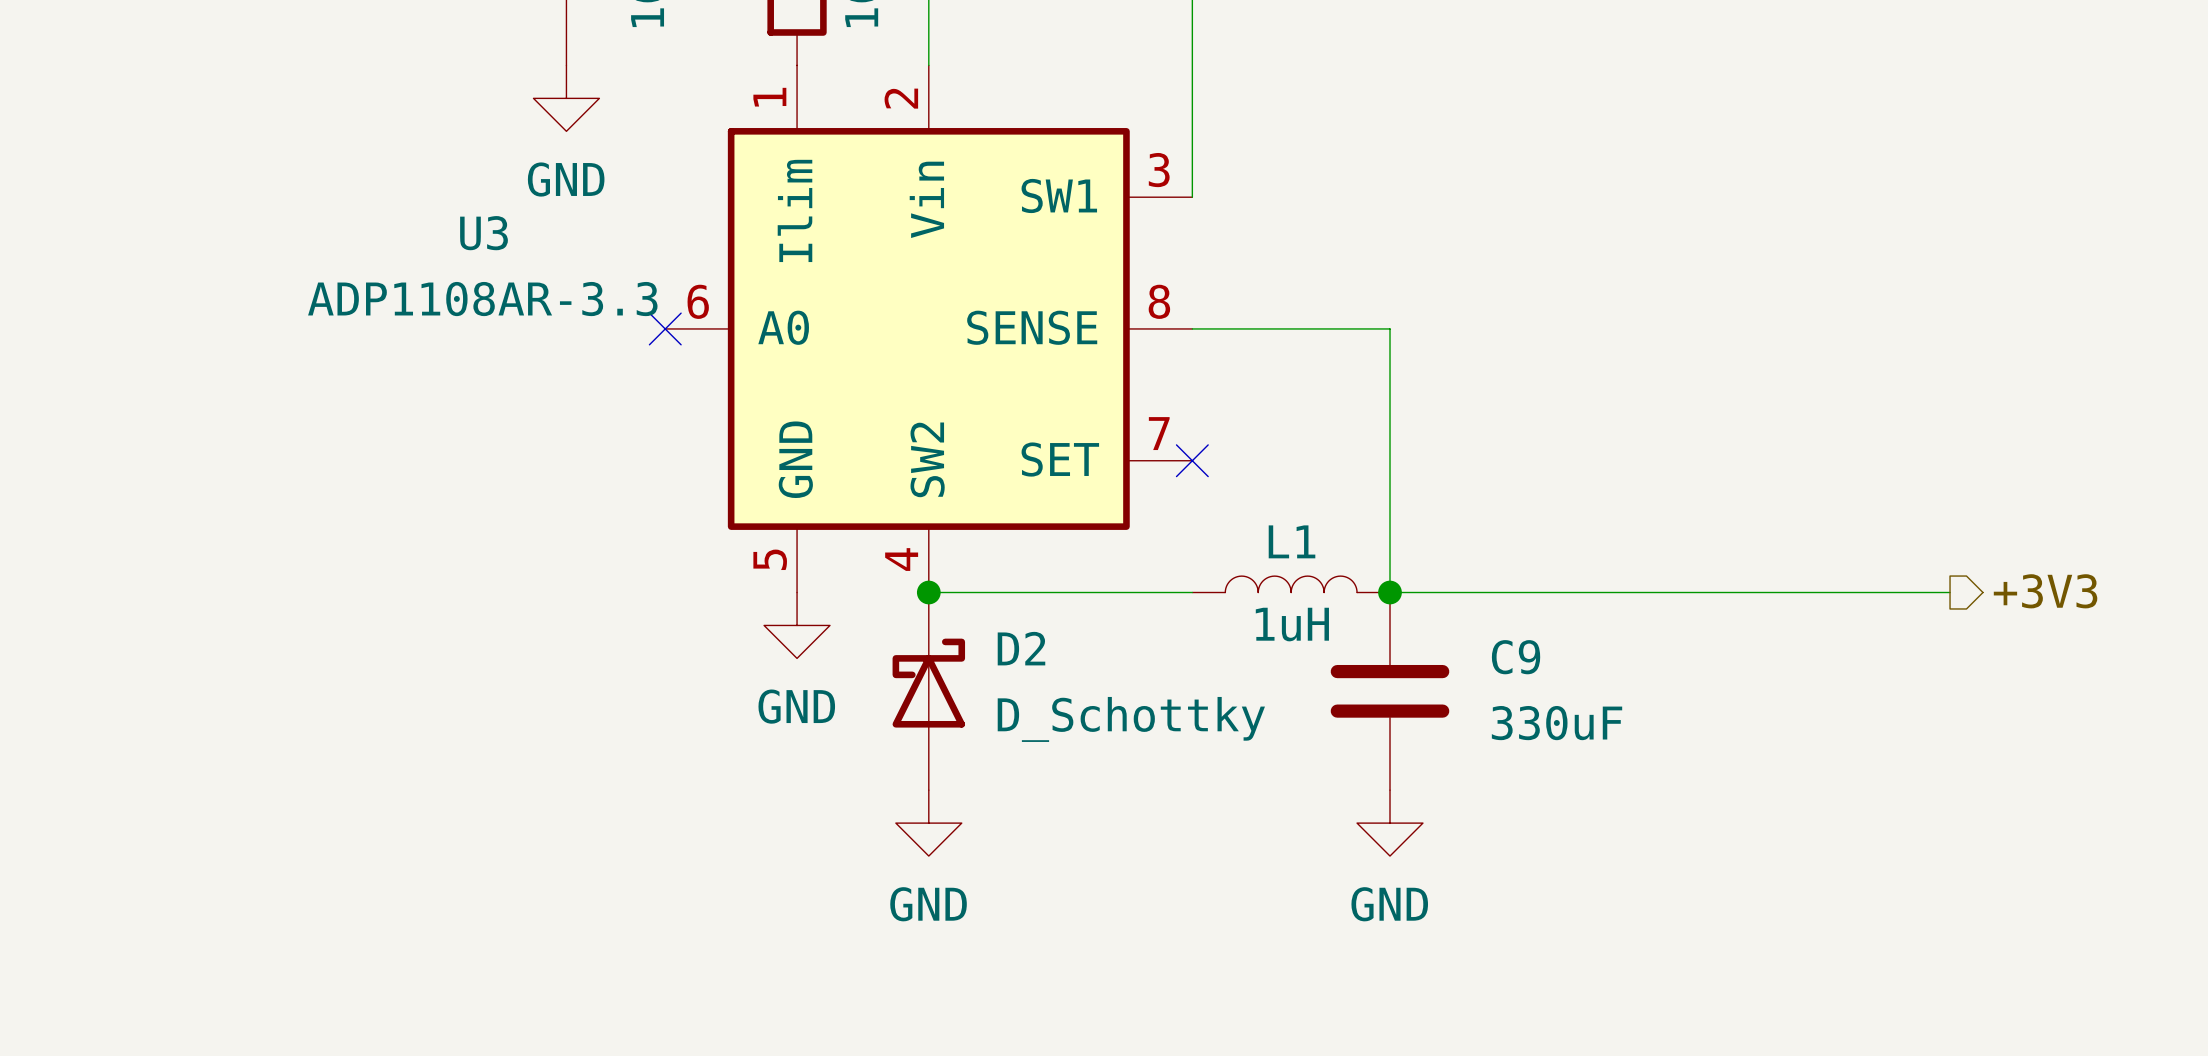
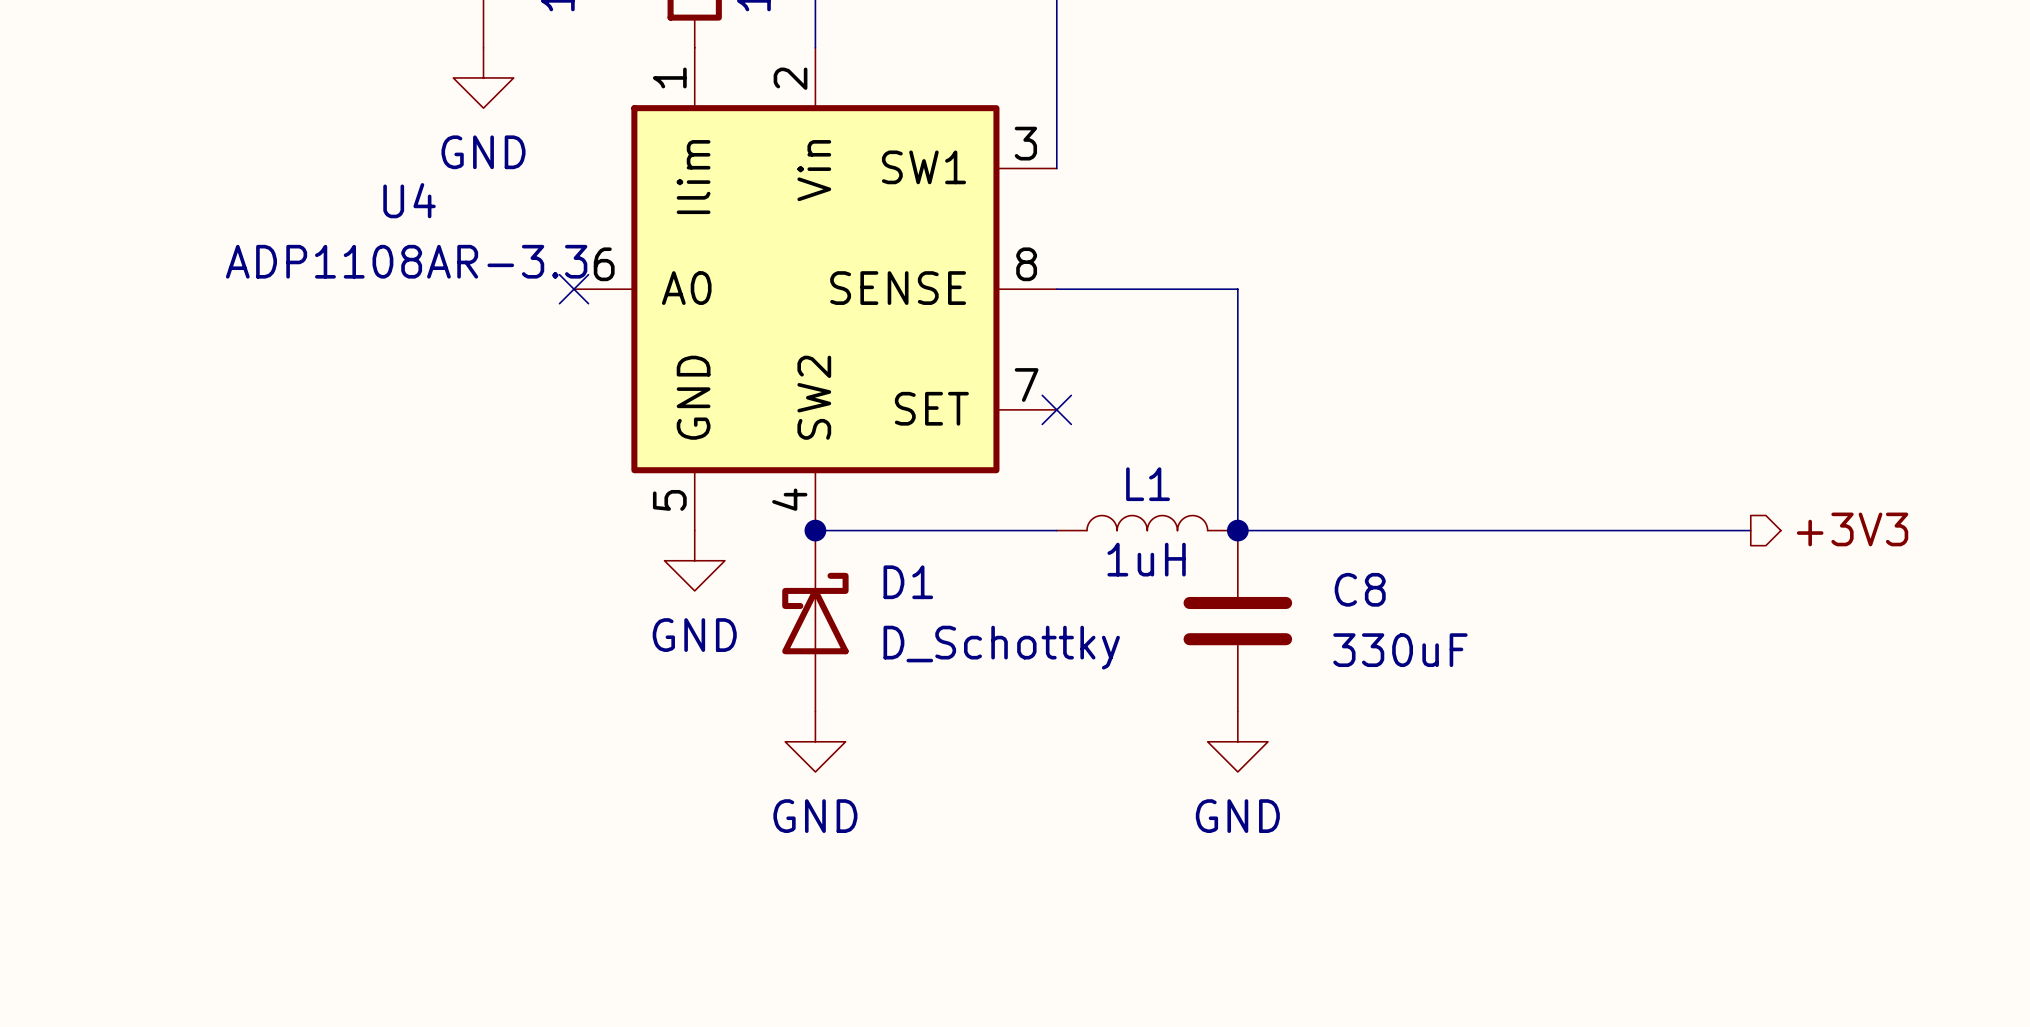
U3 name: U3 (484, 233) -> U4 (409, 200)
D2 name: D2 (1021, 648) -> D1 (908, 582)
C9 name: C9 (1516, 657) -> C8 (1360, 589)

